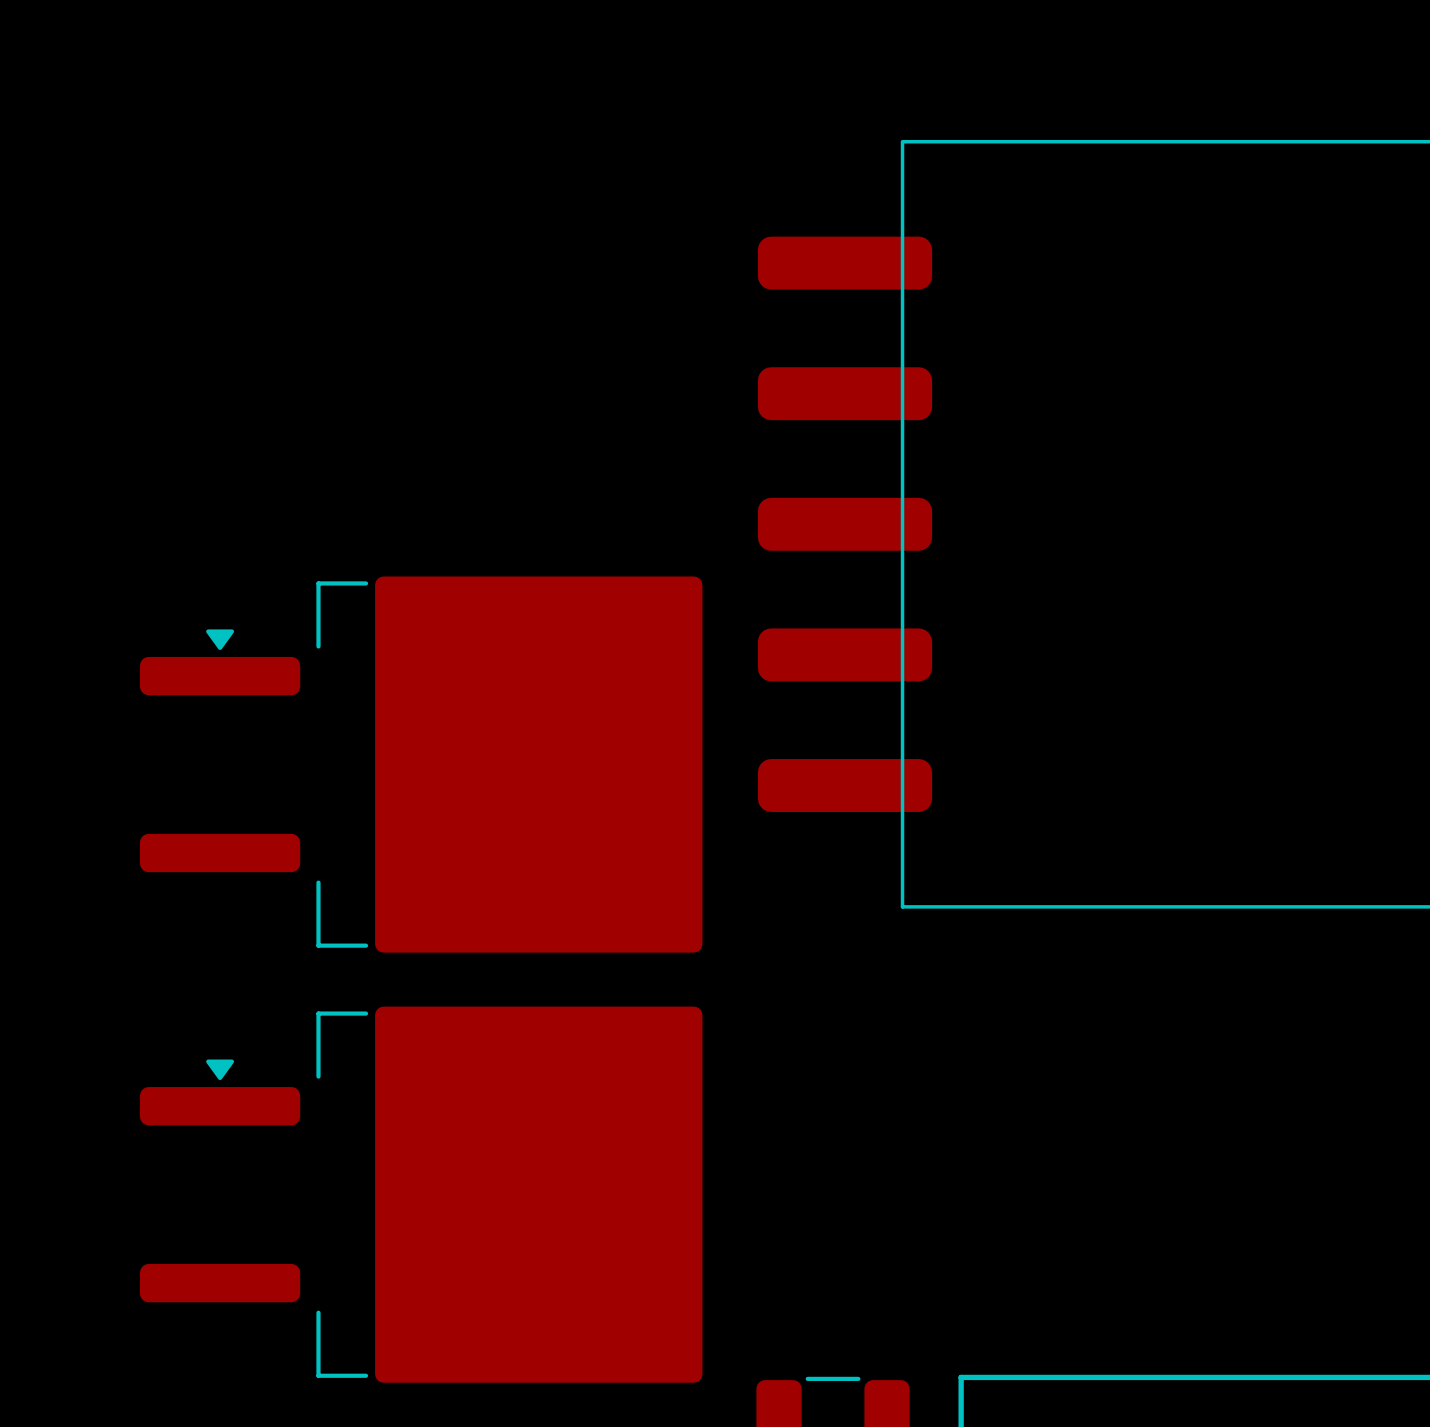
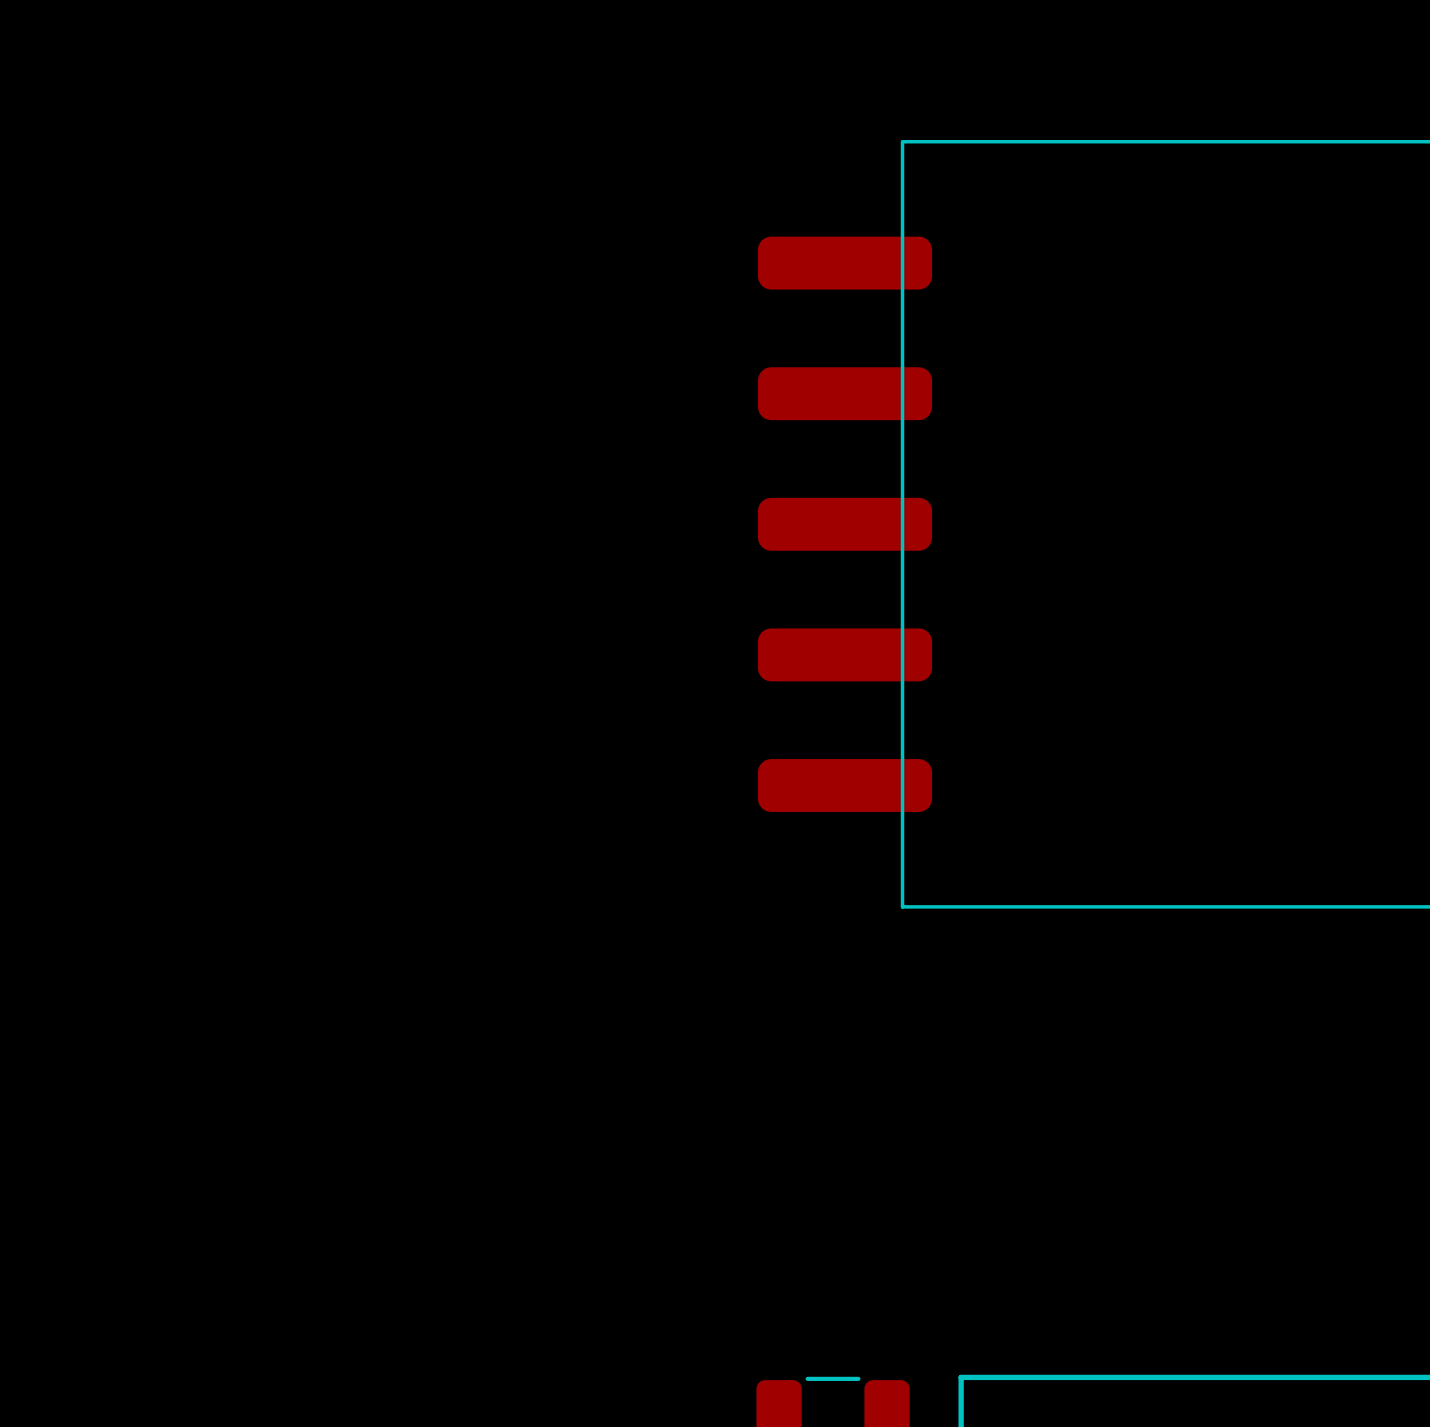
part: (421, 764) -> none
part: (421, 1194) -> none

